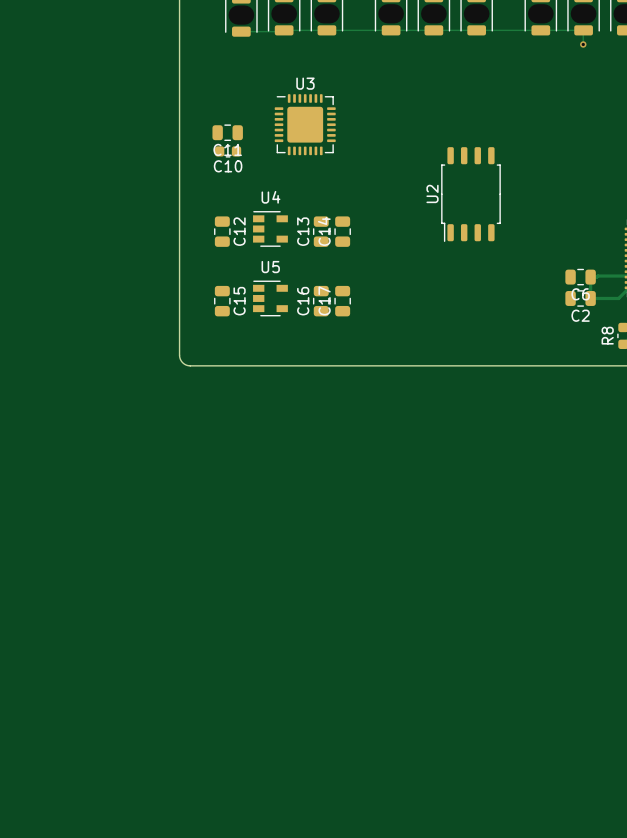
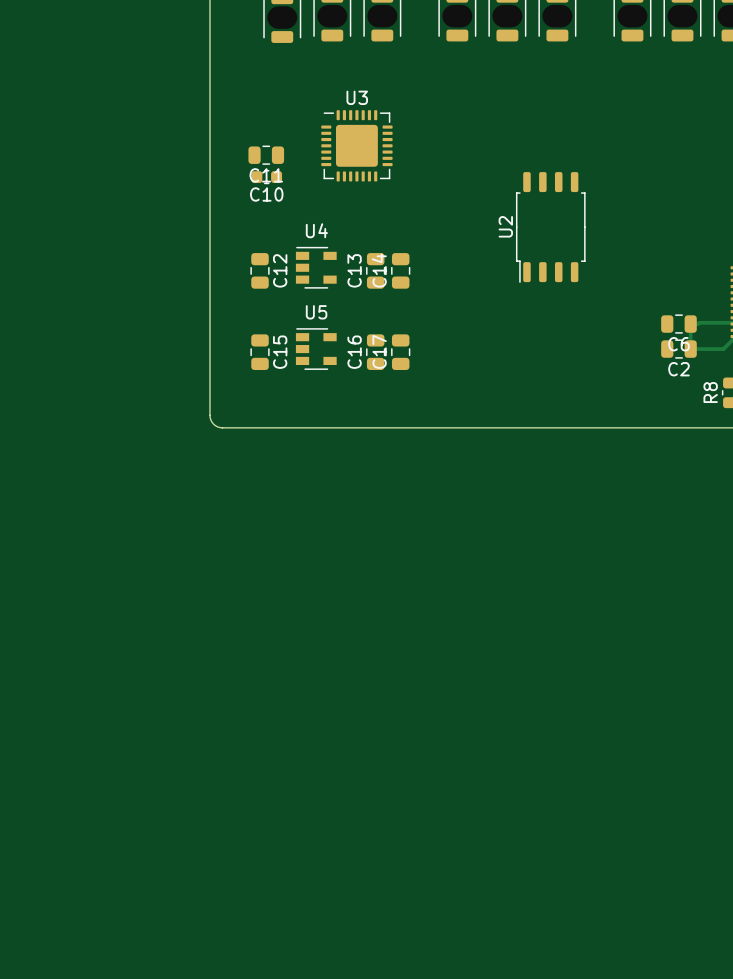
track: (241, 31) (583, 30) (583, 44) -> none
via: (583, 44) -> none

